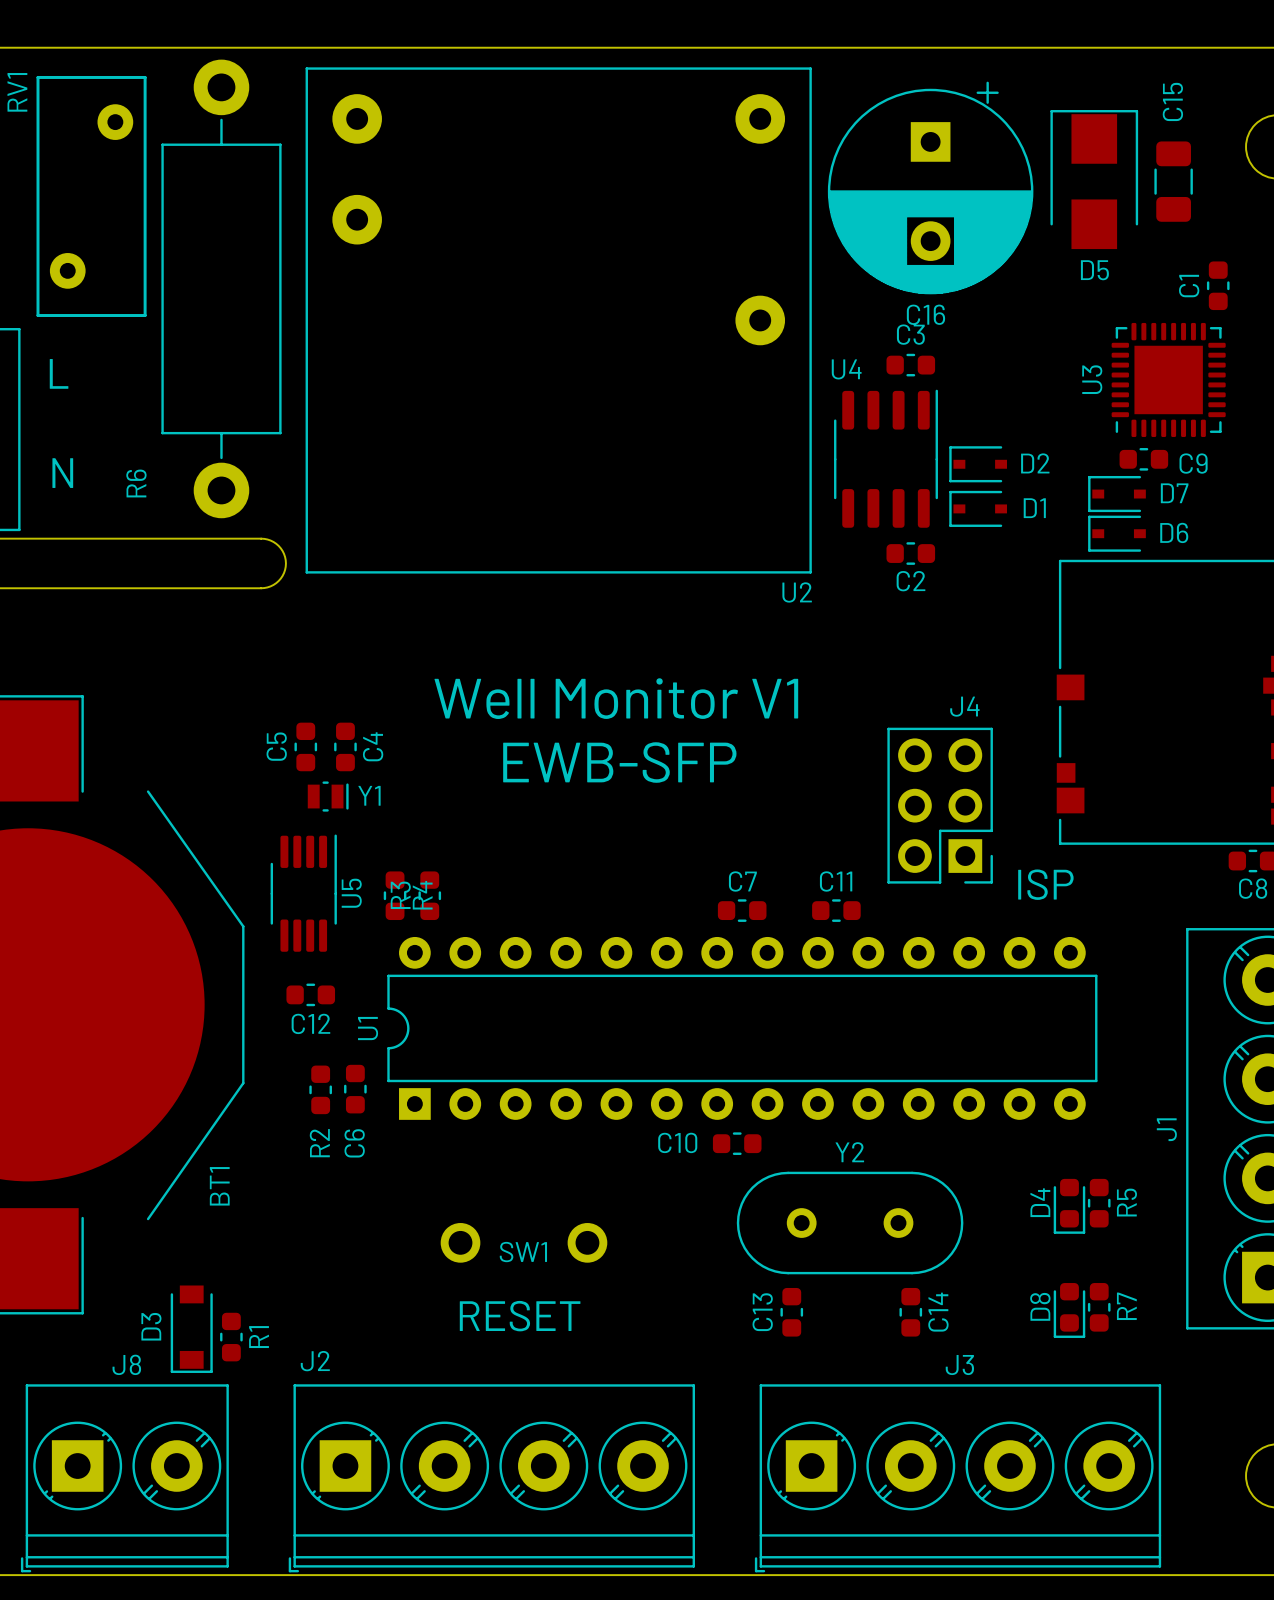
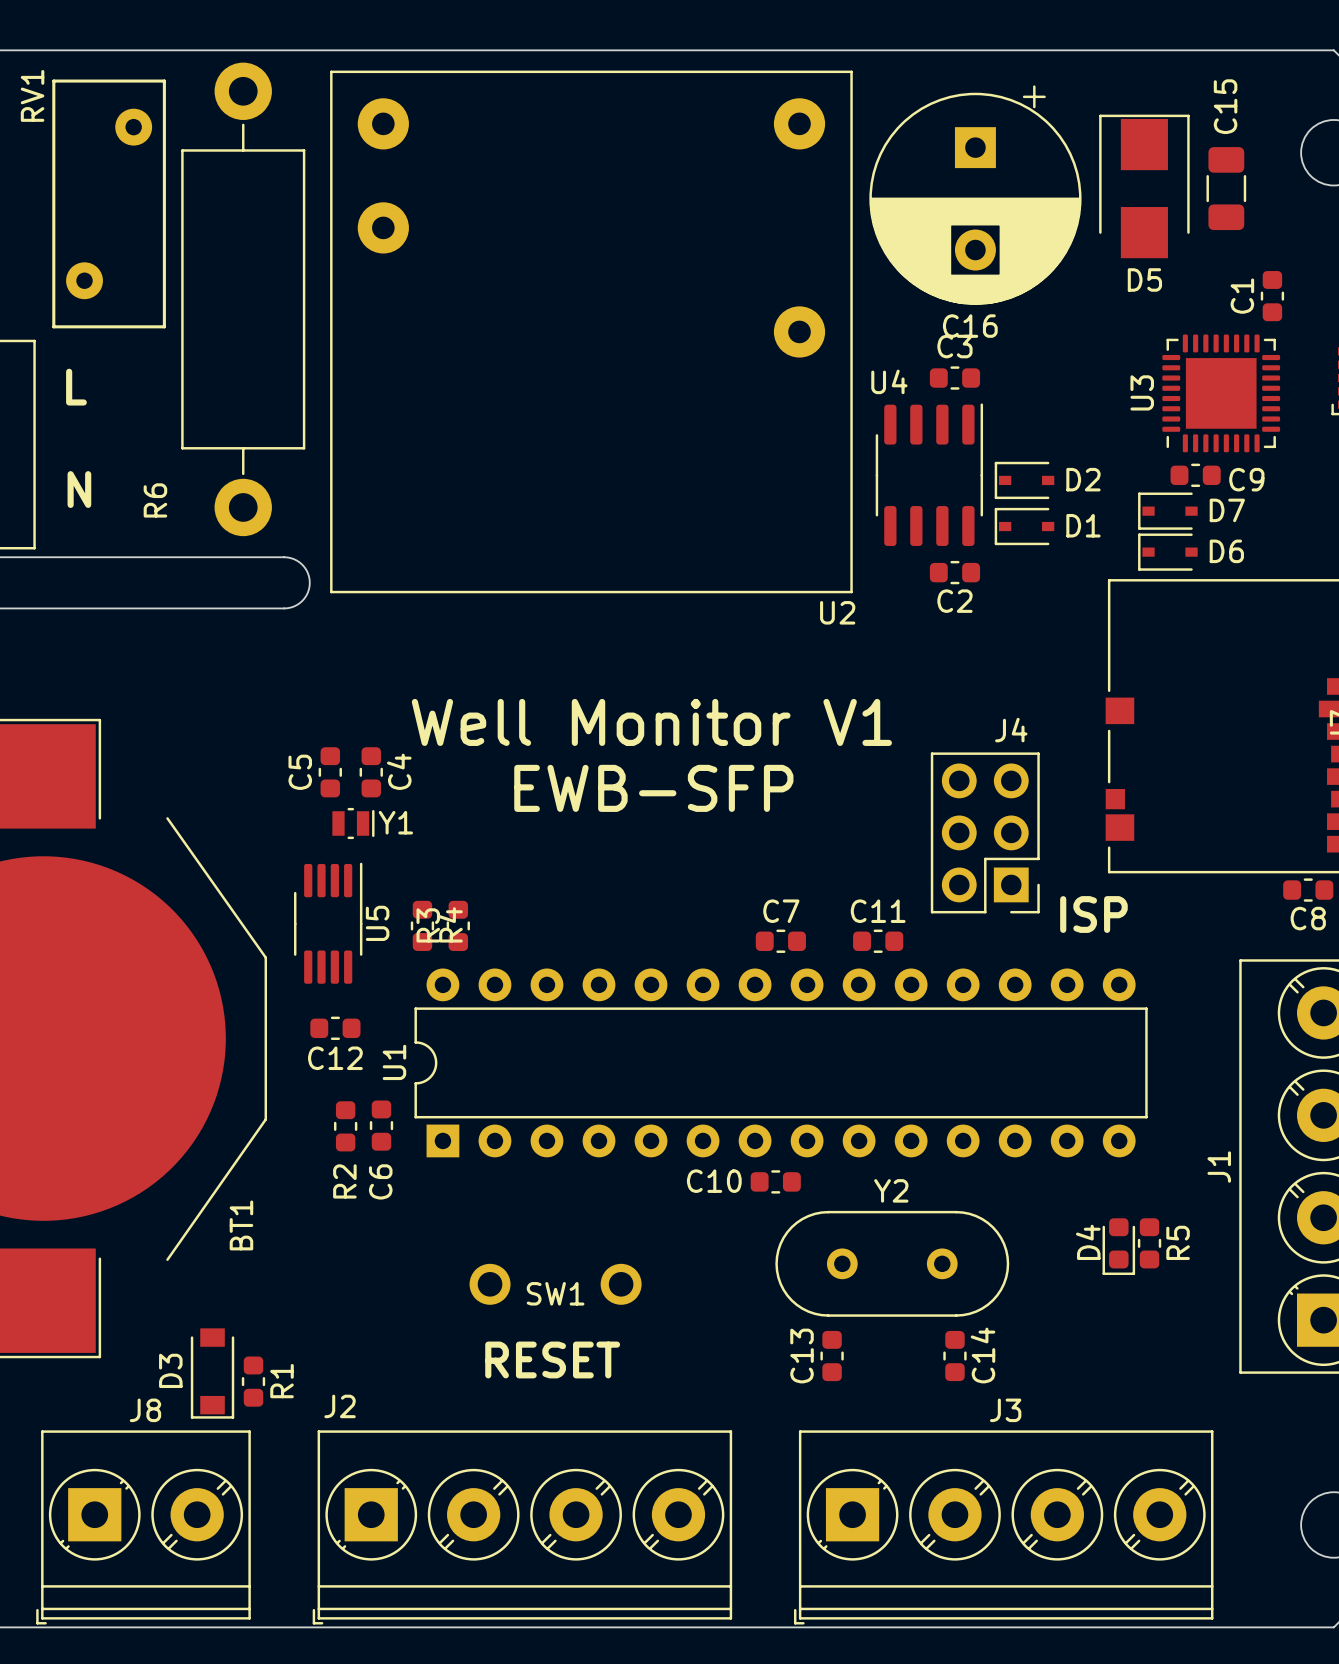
R7: (1099, 1307) -> none
D8: (1069, 1310) -> none

